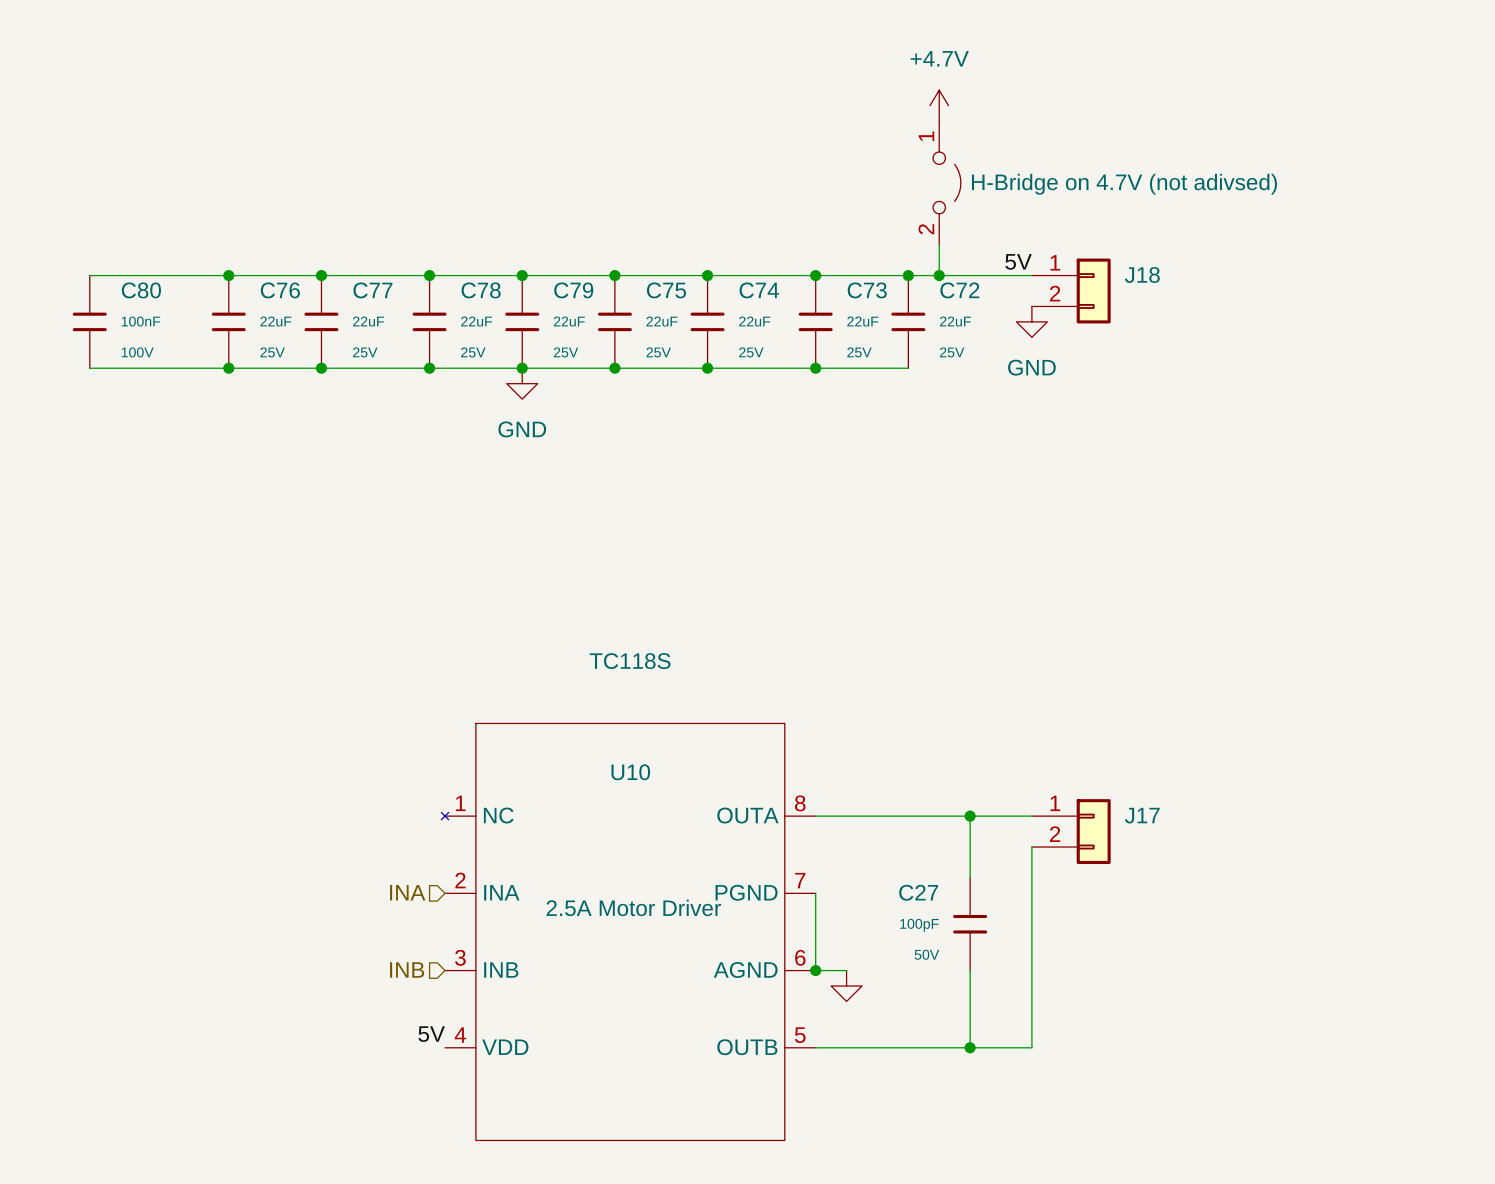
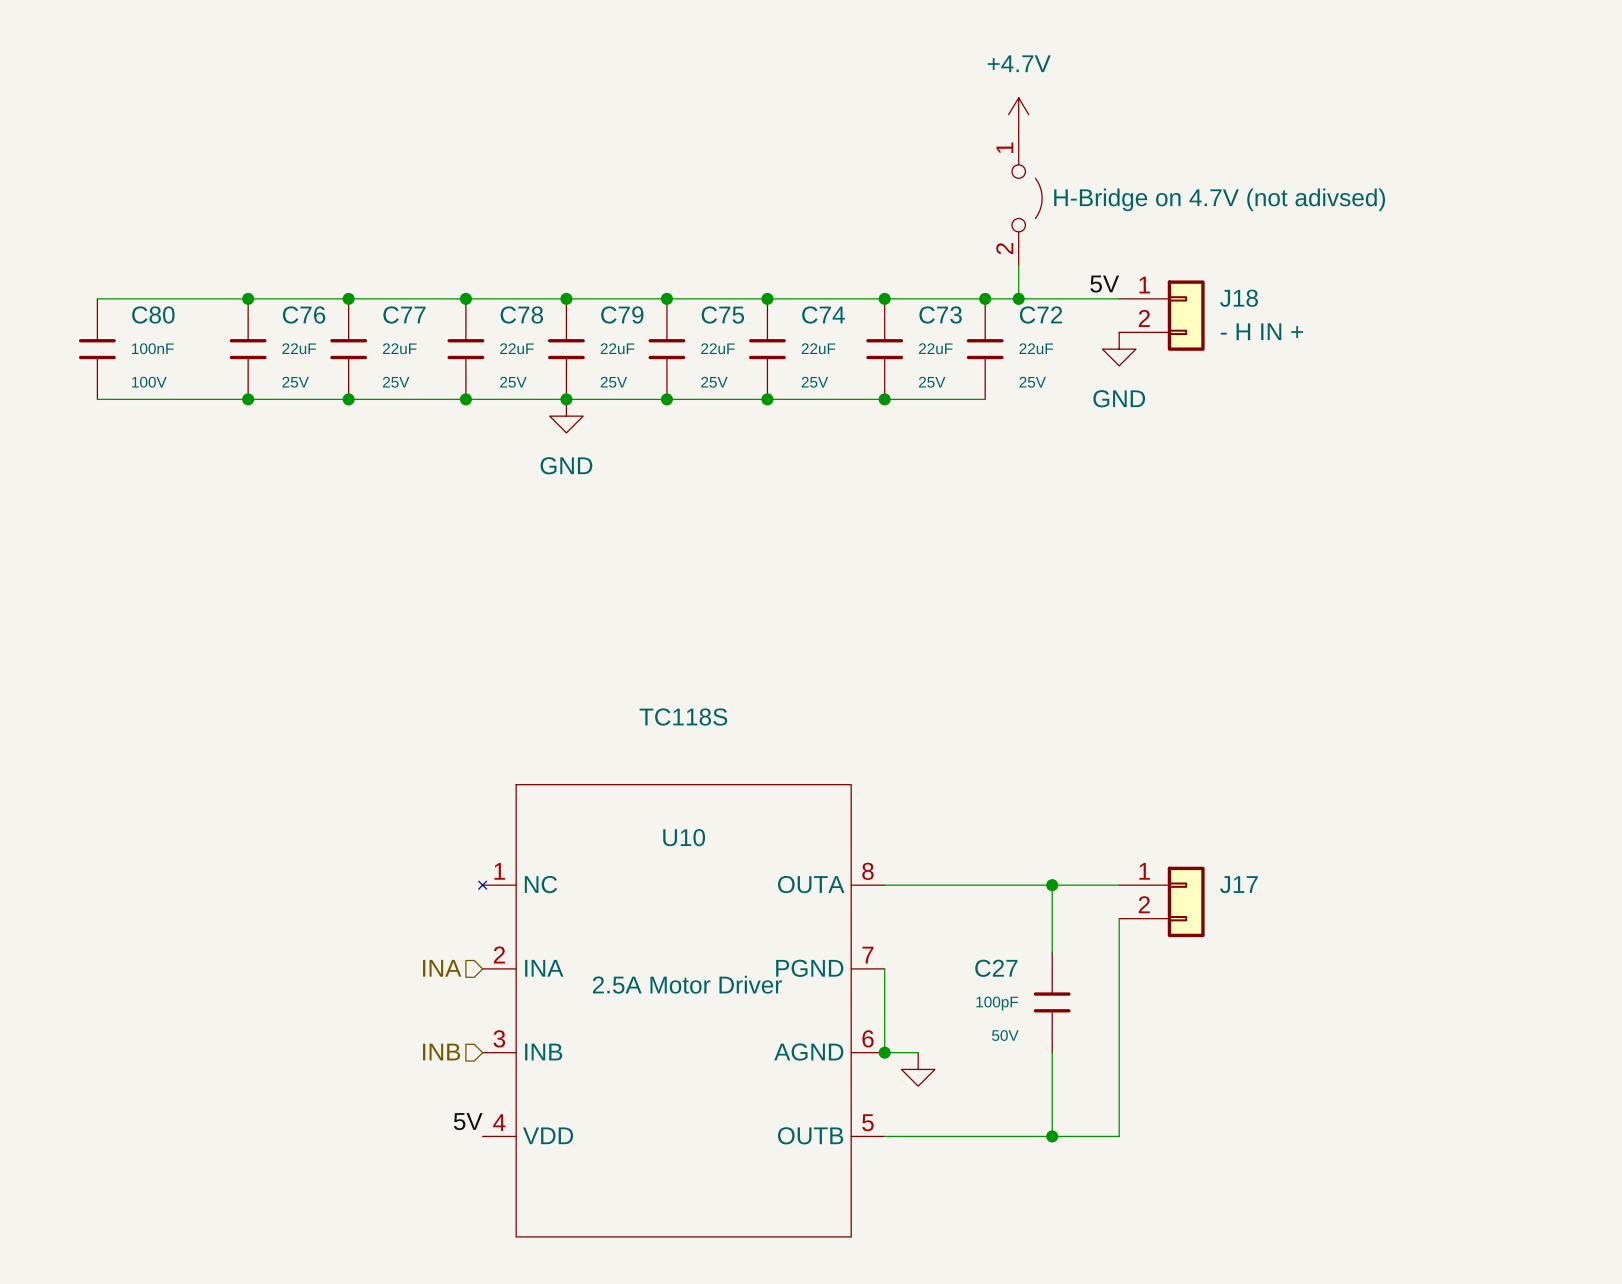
J18 value: none -> - H IN + (1261, 331)

